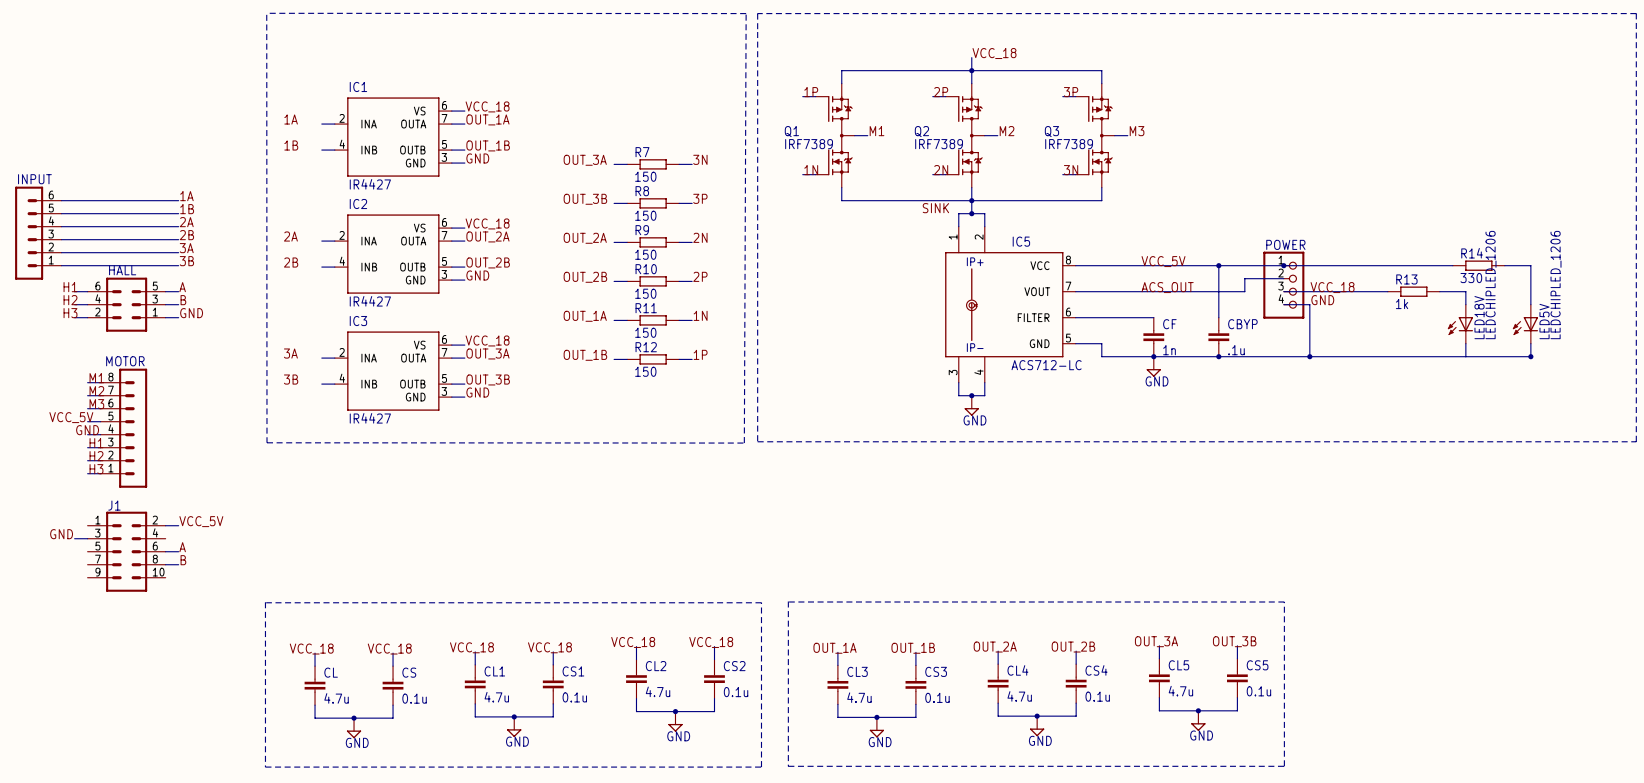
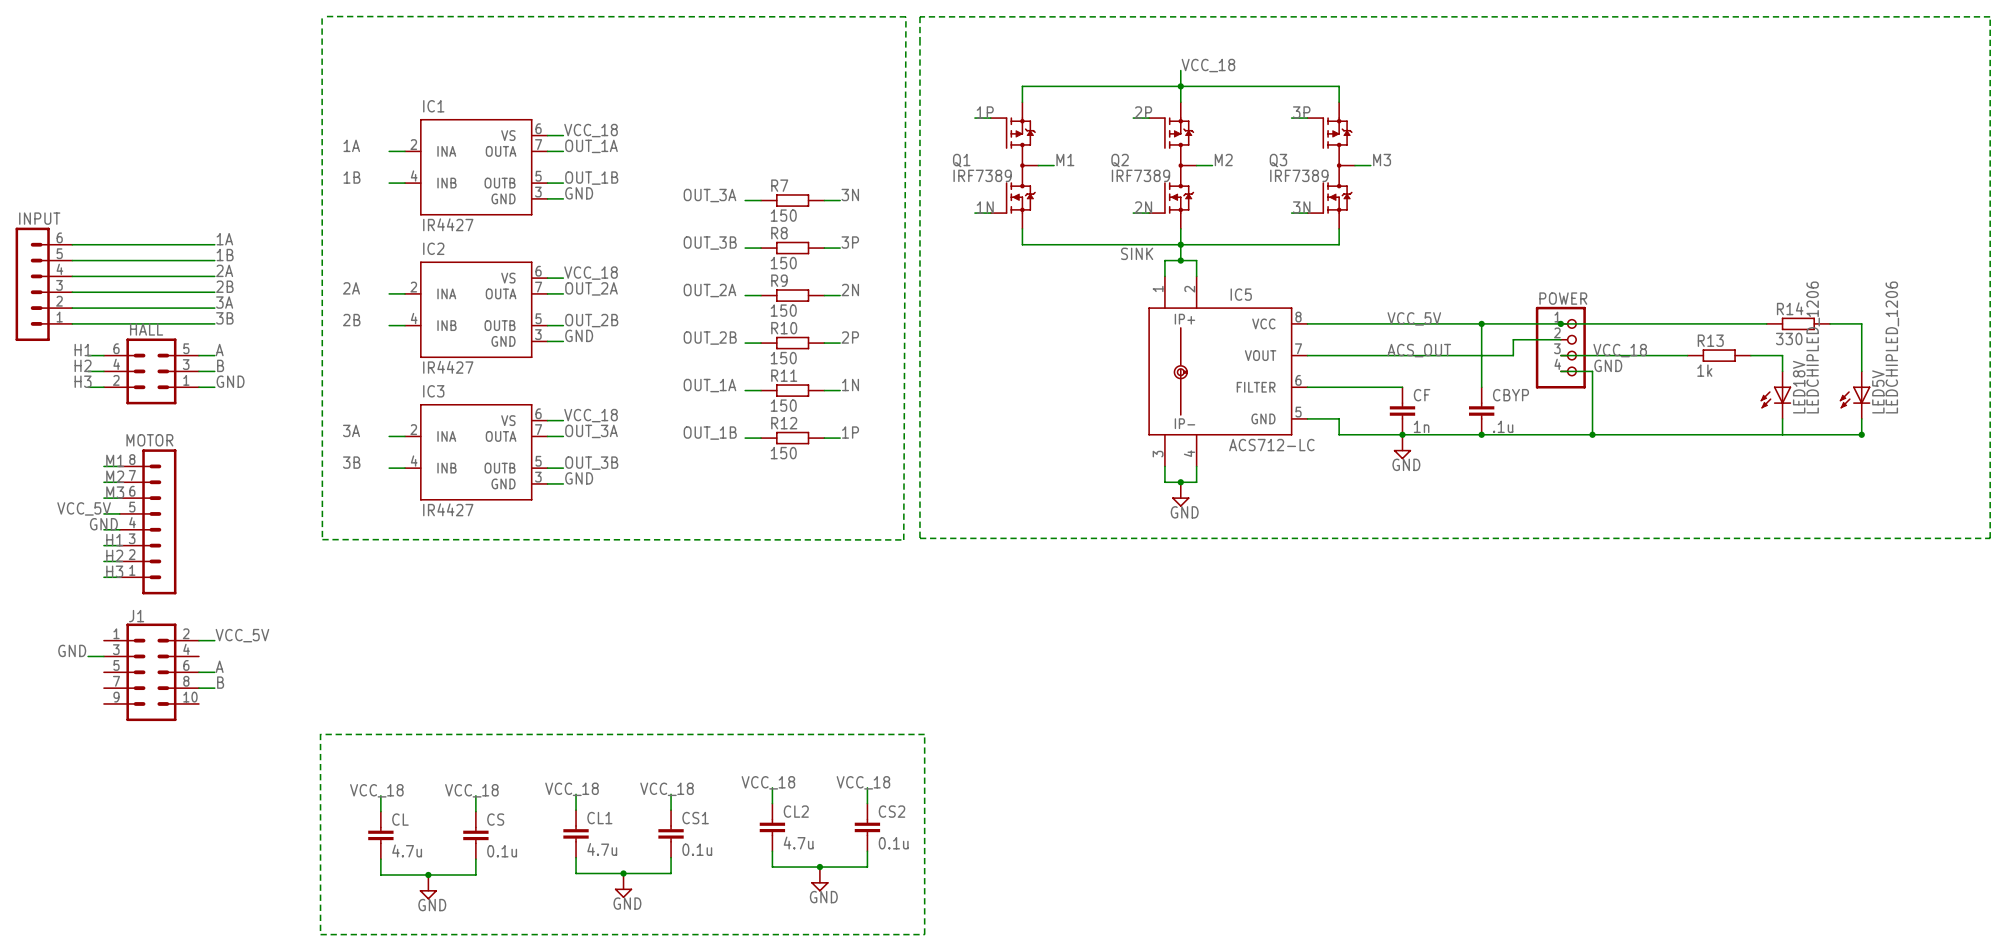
wire: (788, 601) (788, 766) (1284, 766) (1284, 602) (789, 602) -> none
label: OUT_3A (1156, 641) -> none
label: OUT_3B (1234, 641) -> none
wire: (1159, 645) (1159, 658) -> none
wire: (1237, 645) (1237, 658) -> none
label: OUT_2A (995, 647) -> none
label: OUT_2B (1073, 647) -> none
label: OUT_1A (835, 648) -> none
label: OUT_1B (913, 648) -> none
wire: (998, 651) (998, 664) -> none
wire: (1076, 651) (1076, 664) -> none
wire: (837, 652) (837, 665) -> none
wire: (915, 652) (915, 665) -> none
CL5: 4.7u (1159, 678) -> none
CS5: 0.1u (1237, 678) -> none
CL4: 4.7u (998, 683) -> none
CS4: 0.1u (1076, 683) -> none
CL3: 4.7u (837, 684) -> none
CS3: 0.1u (915, 684) -> none
wire: (1159, 697) (1159, 710) (1237, 710) (1237, 697) -> none
wire: (998, 703) (998, 716) (1076, 716) (1076, 703) -> none
wire: (837, 704) (837, 717) (915, 717) (915, 704) -> none
junction: (1198, 710) -> none
junction: (1037, 716) -> none
junction: (876, 717) -> none
power symbol: GND (1198, 720) -> none
power symbol: GND (1037, 726) -> none
power symbol: GND (876, 727) -> none

